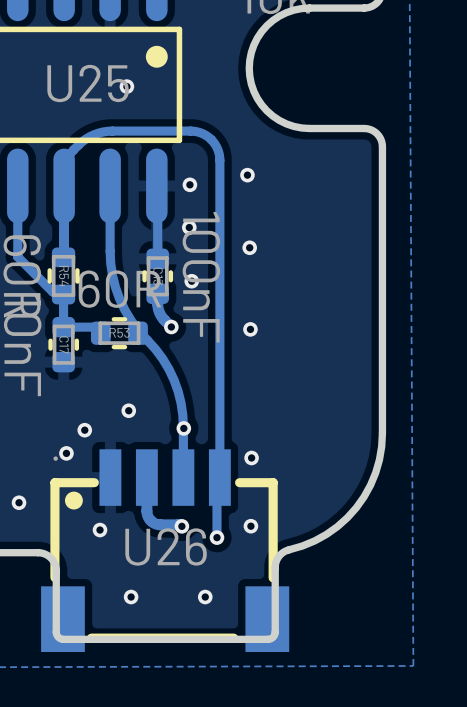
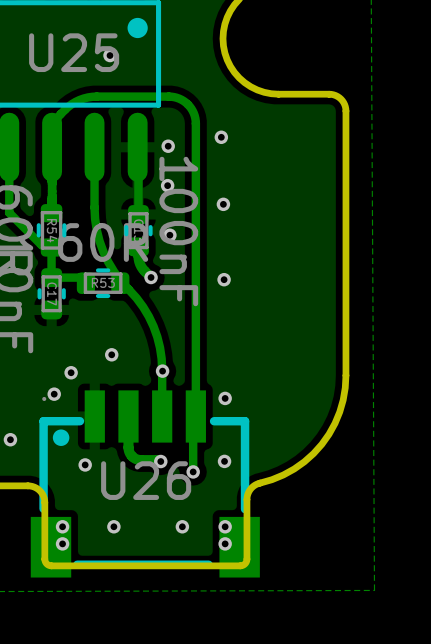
via: none -> (62, 526)
via: none -> (225, 526)
via: none -> (62, 543)
via: none -> (225, 543)

